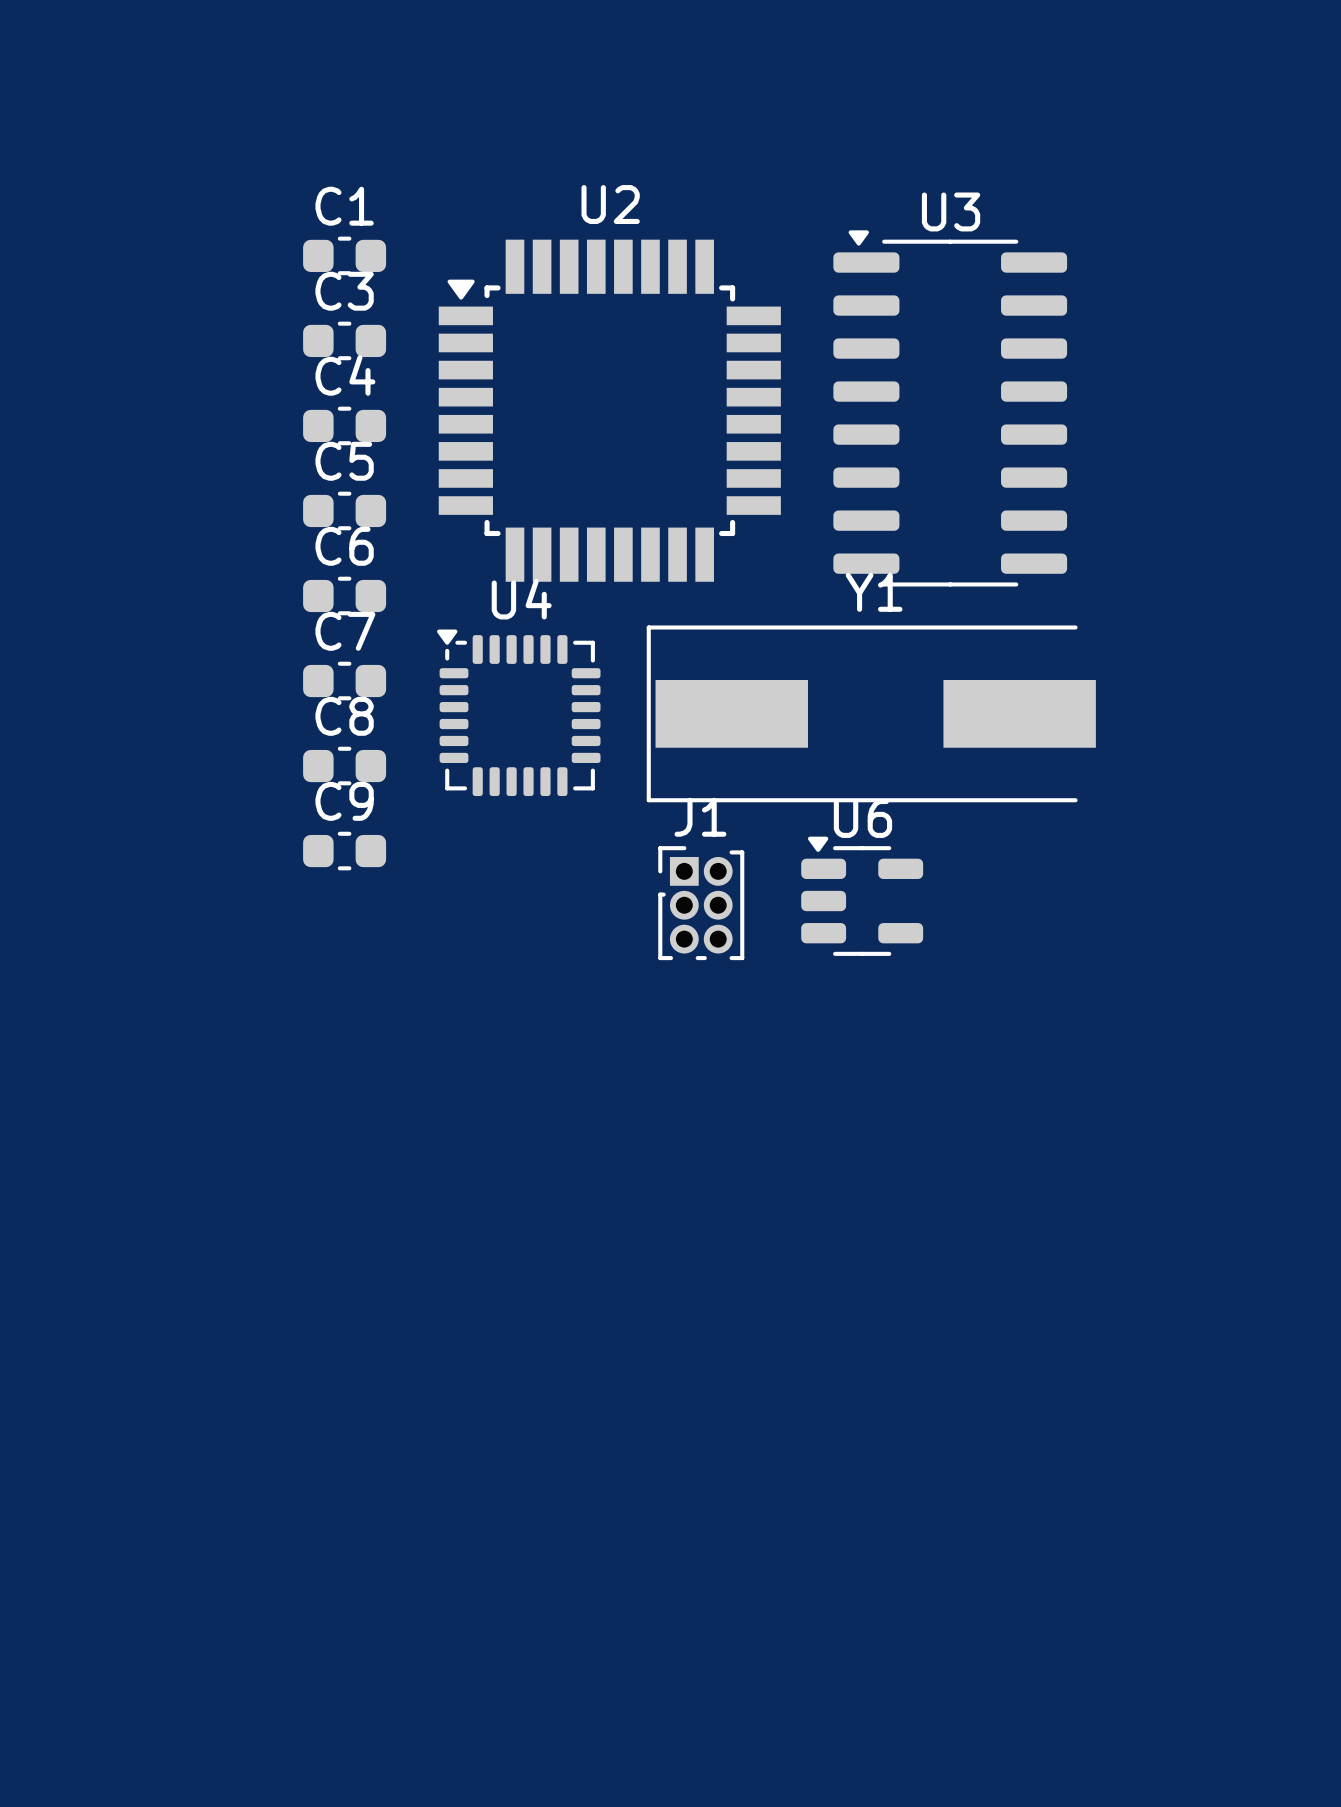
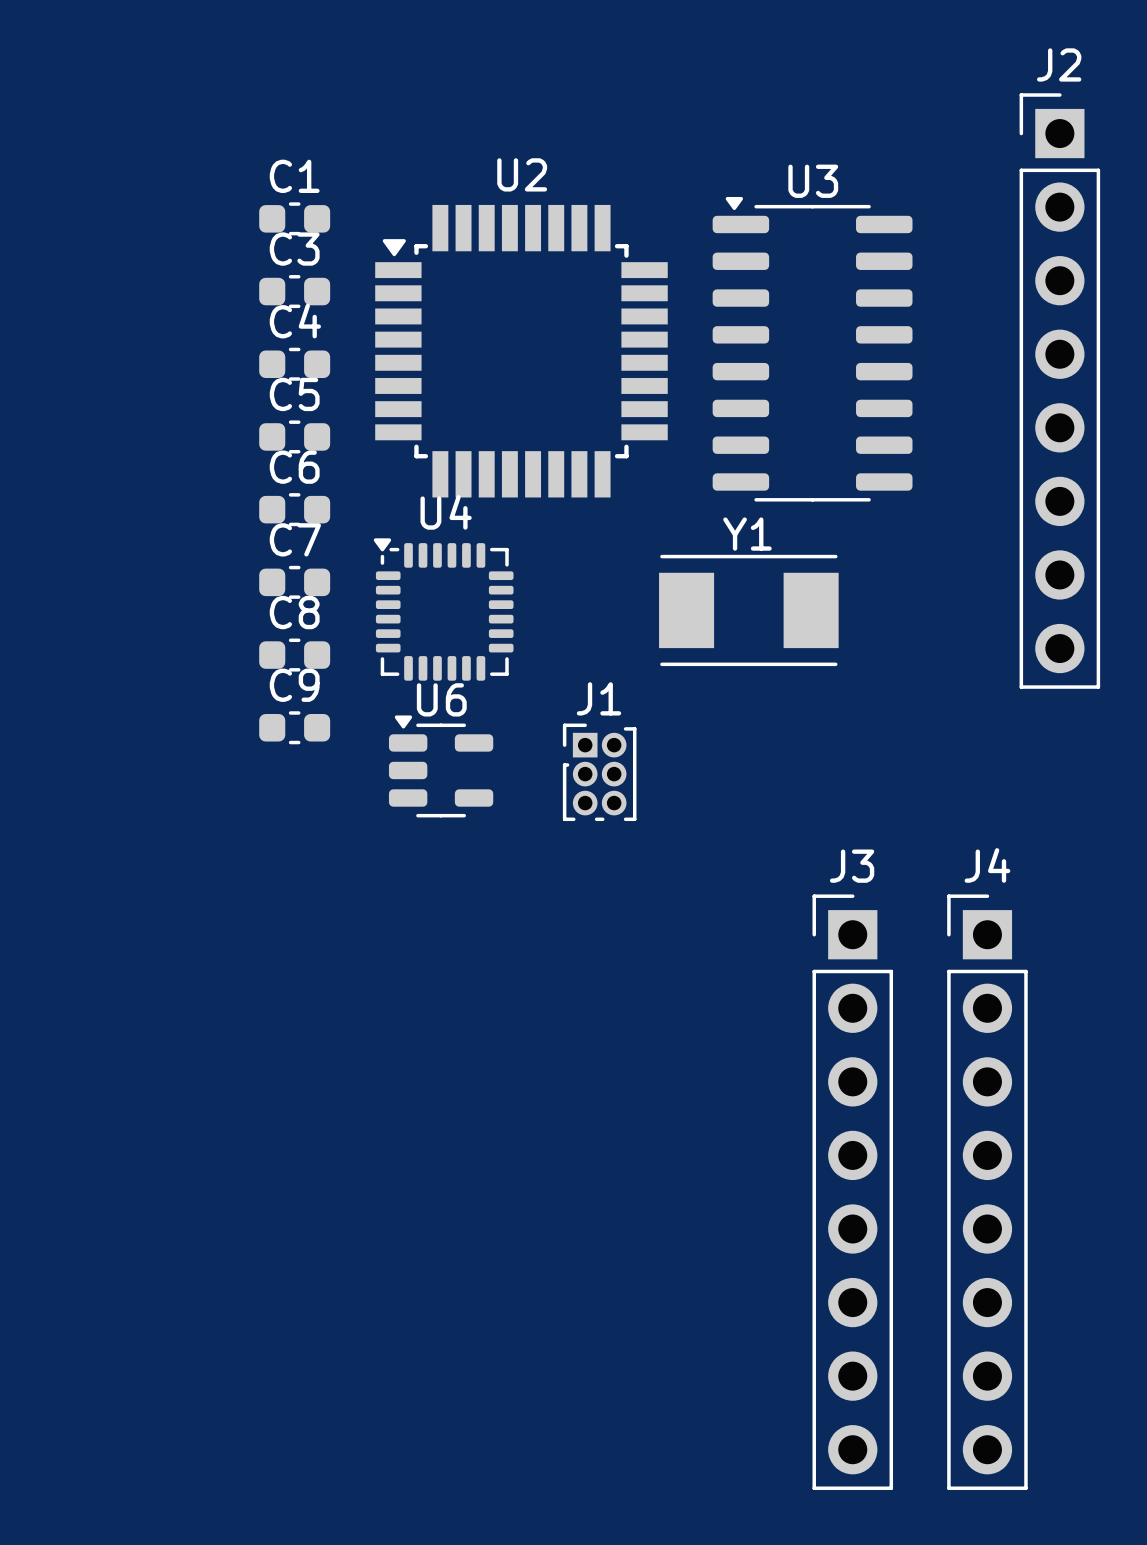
J2: none -> (1059, 391)
Y1 footprint: [646, 625, 1096, 803] -> [659, 554, 839, 667]
U6 position: (862, 896) -> (441, 766)
J3: none -> (852, 1192)
J4: none -> (987, 1192)

